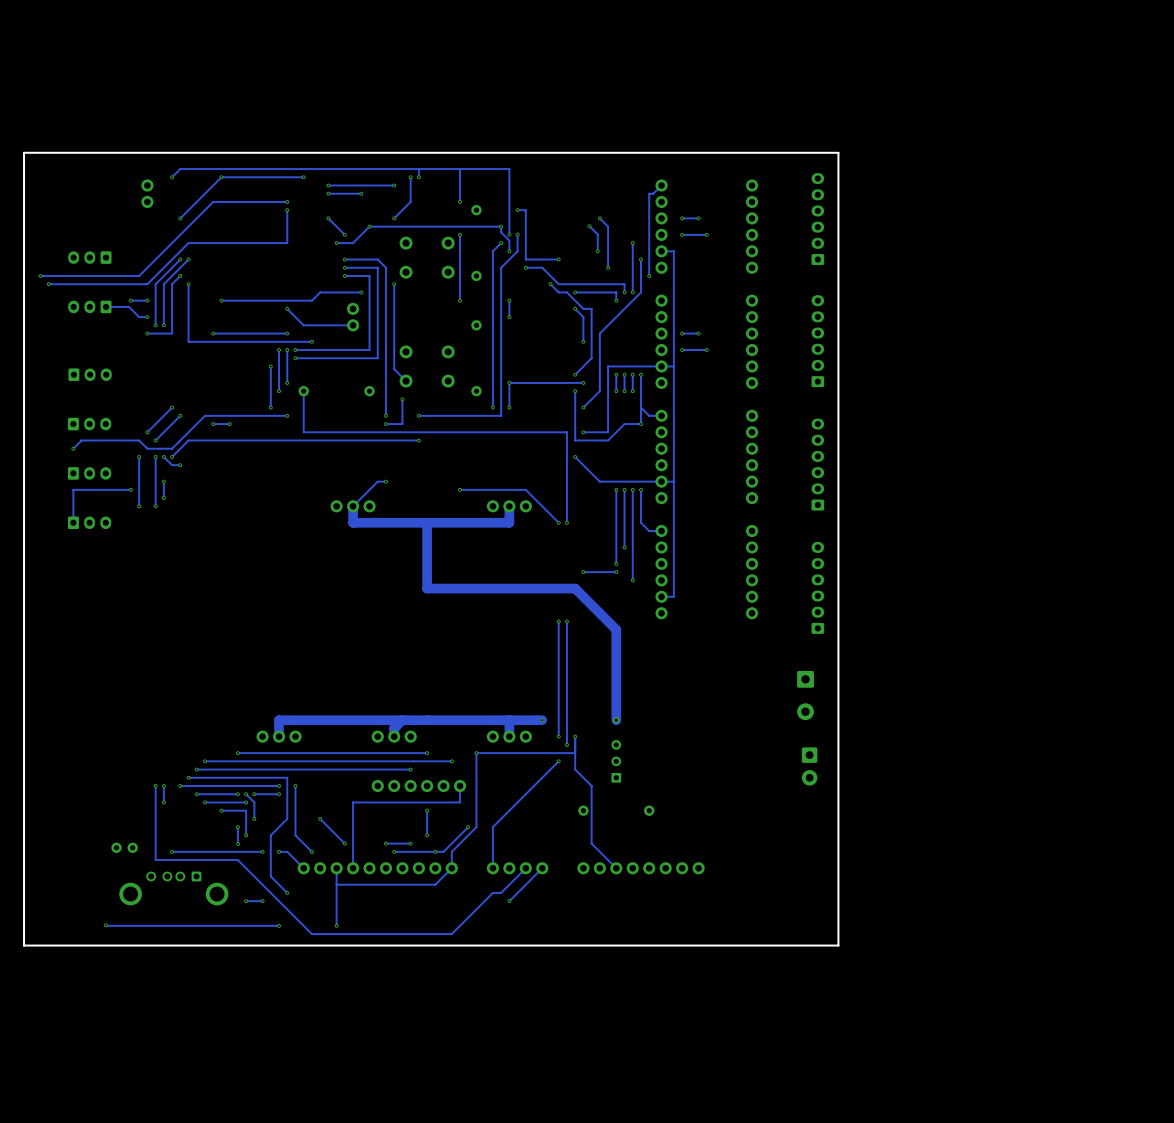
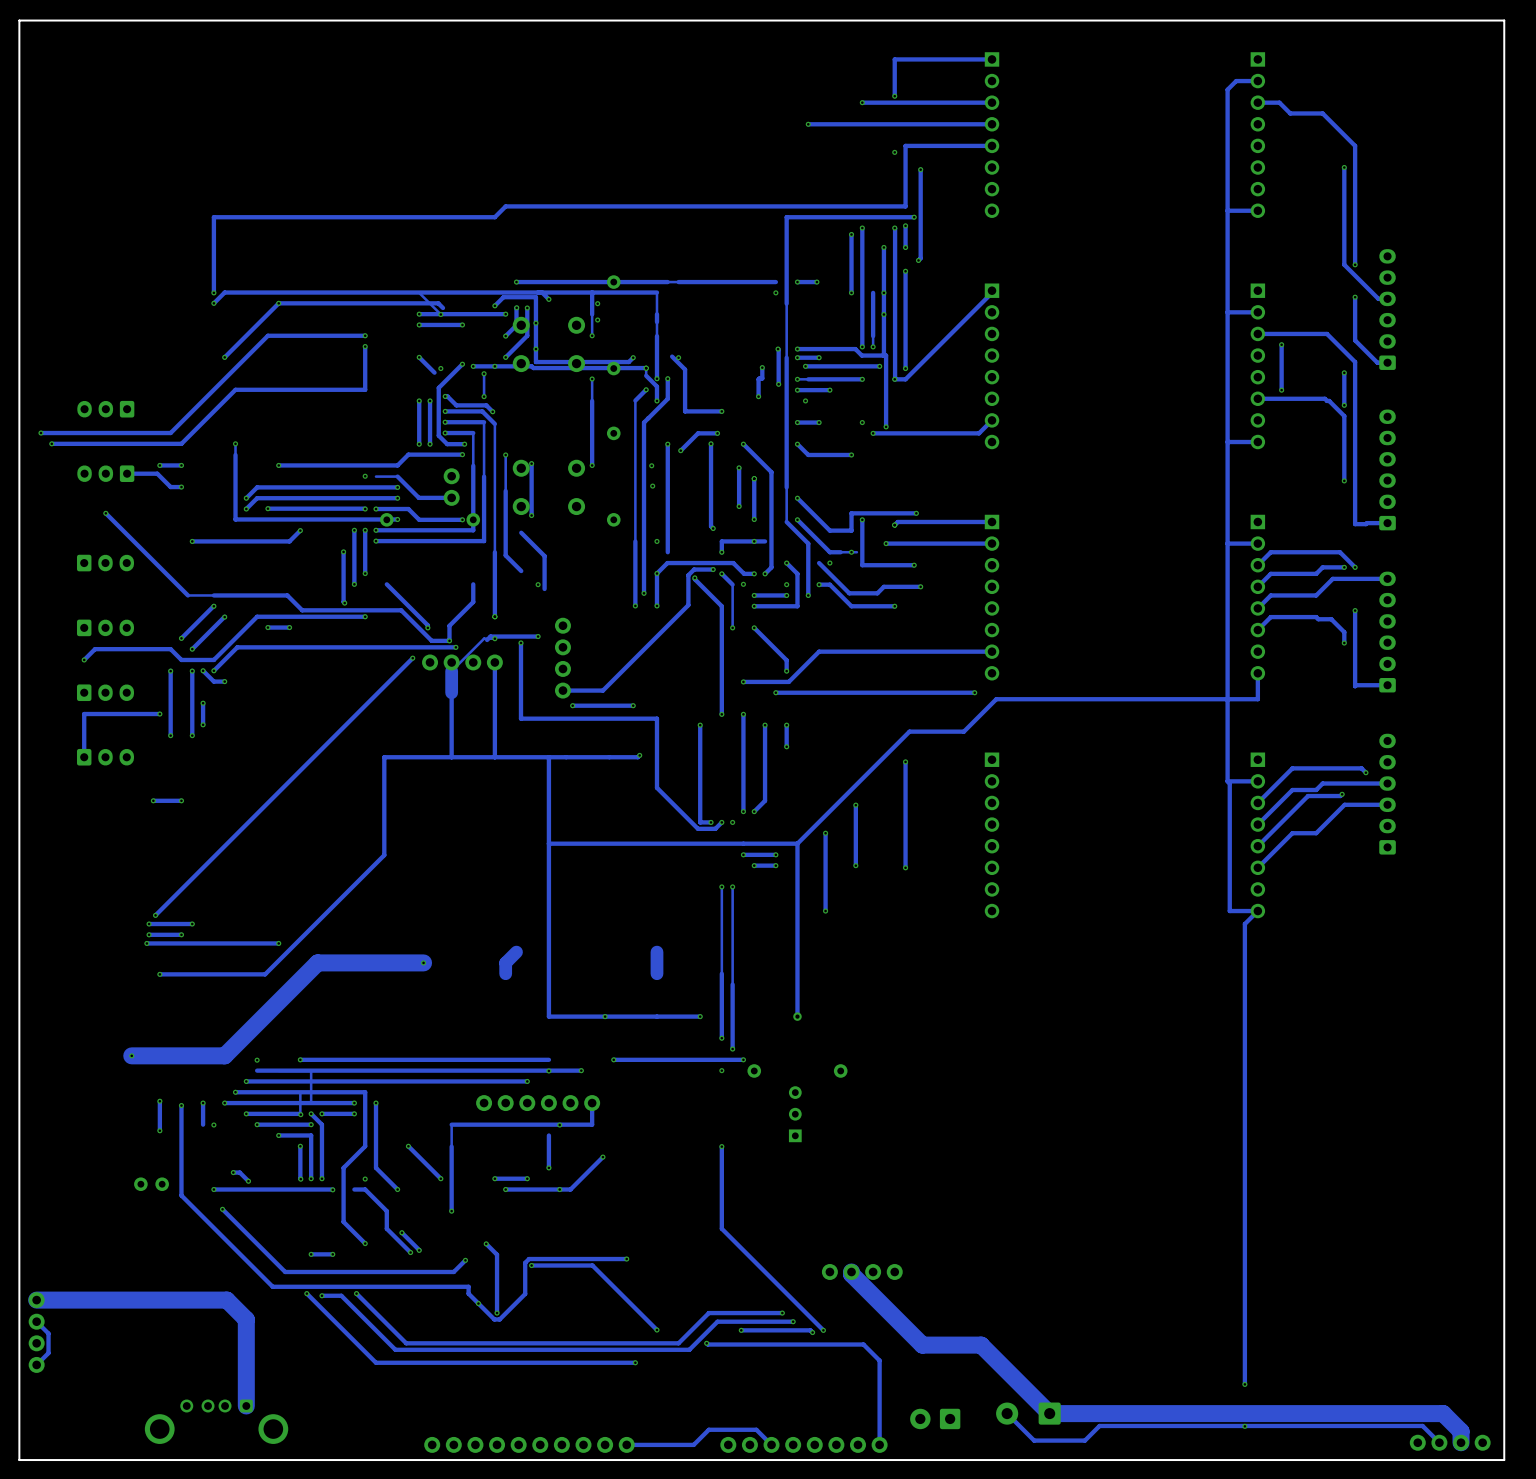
track: none -> (992, 59) (894, 59) (894, 96)
track: none -> (1257, 81) (1236, 81) (1227, 89) (1227, 781)
via: none -> (894, 96)
via: none -> (862, 102)
track: none -> (992, 102) (862, 102)
track: none -> (1257, 102) (1279, 102) (1290, 113) (1322, 113) (1355, 145) (1355, 264)
via: none -> (808, 124)
track: none -> (992, 124) (808, 124)
part: none -> (992, 135)
part: none -> (1257, 135)
track: none -> (992, 145) (905, 145) (905, 206) (505, 206) (494, 217) (213, 217) (213, 292)
via: none -> (894, 152)
track: none -> (1344, 167) (1344, 264) (1378, 298) (1387, 298)
via: none -> (1344, 167)
track: none -> (920, 169) (920, 258) (918, 260)
via: none -> (920, 169)
board edge: (24, 152) (838, 152) (838, 945) (24, 945) -> (19, 206) (19, 20) (1504, 20) (1504, 1460) (19, 1460) (19, 1248)
track: none -> (1257, 210) (1227, 210)
via: none -> (914, 217)
track: none -> (905, 225) (905, 247)
via: none -> (905, 225)
track: (418, 169) (418, 177) -> none
track: (460, 169) (460, 201) -> none
track: none -> (862, 228) (862, 346)
via: none -> (862, 228)
track: none -> (894, 228) (894, 379) (905, 379) (992, 292) (992, 290)
via: none -> (894, 228)
track: none -> (851, 234) (851, 292)
via: none -> (851, 234)
track: (172, 177) (180, 169) (509, 169) (509, 218) -> (213, 303) (224, 292) (656, 292)
via: (172, 177) -> none
via: (221, 177) -> none
track: (303, 177) (221, 177) (180, 218) -> none
via: (303, 177) -> none
track: (410, 177) (410, 201) (394, 218) -> none
via: (410, 177) -> none
via: (418, 177) -> none
track: none -> (883, 247) (883, 355)
via: none -> (883, 247)
via: none -> (905, 247)
via: (328, 185) -> none
track: (394, 185) (328, 185) -> (505, 314) (419, 314)
via: (394, 185) -> none
track: (661, 185) (653, 193) (649, 193) (649, 275) -> none
part: (147, 193) -> none
via: (328, 193) -> none
track: (361, 193) (328, 193) -> (462, 324) (419, 324)
via: (361, 193) -> none
via: none -> (918, 260)
via: none -> (1355, 264)
track: (287, 201) (213, 201) (139, 275) (40, 275) -> (365, 335) (267, 335) (170, 433) (40, 433)
via: (287, 201) -> none
via: (460, 201) -> none
track: none -> (905, 271) (905, 368)
via: none -> (905, 271)
track: (287, 210) (287, 243) (188, 243) (147, 284) (48, 284) -> (365, 346) (365, 389) (235, 389) (181, 443) (51, 443)
via: (287, 210) -> none
via: none -> (516, 282)
track: none -> (667, 282) (516, 282)
via: (517, 210) -> none
track: (525, 210) (525, 259) (558, 259) -> (678, 282) (775, 282)
via: none -> (797, 282)
track: none -> (816, 282) (797, 282)
via: none -> (816, 282)
via: none -> (213, 292)
via: (180, 218) -> none
via: (328, 218) -> none
via: (394, 218) -> none
track: none -> (542, 292) (548, 299)
track: none -> (592, 292) (592, 314)
track: (599, 218) (608, 226) -> (914, 217) (786, 217) (786, 303)
via: none -> (851, 292)
track: (698, 218) (682, 218) -> (819, 357) (797, 357)
via: (698, 218) -> none
part: (817, 219) -> none
track: none -> (1355, 297) (1355, 340) (1377, 362) (1387, 362)
via: none -> (1355, 297)
via: none -> (548, 299)
via: none -> (213, 303)
via: none -> (278, 303)
via: (369, 226) -> none
via: none -> (597, 303)
via: (501, 226) -> none
track: (589, 226) (597, 234) (597, 251) -> none
via: (589, 226) -> none
part: (661, 226) -> none
part: (752, 226) -> none
track: none -> (494, 305) (503, 297) (535, 297) (535, 362) (628, 362) (633, 357)
via: none -> (494, 305)
track: none -> (443, 308) (438, 303) (278, 303) (224, 357)
track: none -> (516, 307) (516, 325) (505, 336)
via: none -> (516, 307)
track: none -> (527, 308) (527, 335) (505, 357)
via: none -> (527, 308)
part: none -> (1387, 309)
track: none -> (1257, 312) (1227, 312)
via: none -> (419, 314)
via: none -> (505, 314)
via: (460, 234) -> none
via: (509, 234) -> none
track: (517, 234) (517, 251) (501, 267) (501, 275) -> (473, 366) (646, 368)
via: (517, 234) -> none
track: (706, 234) (682, 234) -> (829, 390) (797, 390)
via: (706, 234) -> none
via: none -> (597, 320)
track: (509, 240) (501, 232) (501, 226) (369, 226) (353, 243) (336, 243) -> (656, 322) (656, 314)
via: none -> (535, 323)
via: none -> (419, 324)
via: none -> (462, 324)
via: (336, 243) -> none
track: (501, 243) (492, 251) (492, 300) -> (646, 389) (635, 400)
via: (501, 243) -> none
track: (632, 243) (632, 292) -> none
via: (632, 243) -> none
track: none -> (1257, 333) (1327, 333) (1355, 362) (1355, 524) (1387, 523)
via: none -> (365, 335)
via: none -> (505, 336)
track: (460, 251) (460, 283) -> (430, 400) (430, 444)
via: none -> (592, 335)
track: none -> (656, 336) (656, 378)
via: (509, 251) -> none
via: (597, 251) -> none
track: (673, 251) (661, 251) -> (873, 336) (873, 292)
part: (89, 257) -> none
track: none -> (1281, 344) (1281, 390)
via: none -> (1281, 344)
track: (180, 259) (155, 284) (155, 325) -> none
via: (180, 259) -> none
track: (188, 259) (163, 284) (163, 325) -> none
via: (188, 259) -> none
via: none -> (365, 346)
track: (344, 259) (377, 259) (385, 267) (385, 318) -> (445, 411) (482, 411) (494, 423)
via: (344, 259) -> none
via: (558, 259) -> none
track: (640, 259) (640, 292) (599, 333) (599, 391) (583, 407) -> none
via: (640, 259) -> none
via: none -> (862, 346)
track: (673, 259) (673, 596) (661, 596) -> none
via: none -> (873, 346)
via: none -> (535, 349)
track: none -> (778, 349) (778, 384)
via: none -> (778, 349)
track: none -> (797, 349) (855, 349) (861, 355) (886, 355) (886, 426)
via: none -> (797, 349)
track: none -> (672, 356) (685, 369) (685, 411) (721, 411)
via: none -> (224, 357)
track: none -> (419, 357) (434, 372)
via: none -> (419, 357)
track: (344, 267) (377, 267) (377, 279) -> none
via: (344, 267) -> none
via: none -> (505, 357)
via: none -> (633, 357)
track: (525, 267) (542, 267) (558, 284) (616, 284) -> none
via: (608, 267) -> none
via: none -> (797, 357)
via: none -> (819, 357)
track: none -> (462, 364) (438, 387) (438, 435) (447, 444) (464, 444)
via: none -> (462, 364)
via: none -> (473, 366)
via: none -> (494, 366)
via: none -> (805, 366)
track: none -> (879, 366) (805, 366)
via: none -> (879, 366)
part: none -> (992, 366)
part: none -> (1257, 366)
via: (40, 275) -> none
track: (180, 275) (172, 284) (172, 333) (147, 333) -> none
via: (180, 275) -> none
track: (344, 275) (369, 275) (369, 325) -> (445, 433) (473, 433)
via: none -> (646, 368)
track: none -> (762, 367) (762, 378) (758, 379) (758, 396)
via: none -> (762, 367)
via: (649, 275) -> none
via: none -> (905, 368)
via: none -> (484, 373)
track: none -> (1344, 372) (1344, 405)
via: none -> (1344, 372)
track: (501, 281) (501, 415) (418, 415) -> none
via: none -> (656, 378)
track: none -> (667, 378) (667, 398) (648, 418)
via: none -> (667, 378)
via: (48, 284) -> none
track: (188, 284) (188, 333) -> none
via: (188, 284) -> none
track: (394, 284) (394, 341) -> none
via: (394, 284) -> none
track: (550, 284) (558, 292) (566, 292) (583, 308) (591, 308) (591, 358) (575, 374) -> none
via: (550, 284) -> none
via: none -> (797, 379)
track: (624, 284) (624, 292) -> (808, 379) (862, 379)
via: none -> (862, 379)
via: none -> (894, 379)
via: none -> (778, 384)
track: (361, 292) (320, 292) (311, 300) (221, 300) -> (462, 454) (408, 454) (397, 465) (278, 465)
via: (361, 292) -> none
via: none -> (646, 389)
track: (575, 292) (616, 292) (616, 300) -> none
via: (575, 292) -> none
via: none -> (797, 390)
via: (624, 292) -> none
via: (632, 292) -> none
via: none -> (829, 390)
via: none -> (1281, 390)
track: none -> (445, 396) (456, 405) (486, 405) (492, 411)
via: none -> (445, 396)
track: (377, 297) (377, 316) -> (445, 422) (484, 422)
via: none -> (484, 396)
via: none -> (758, 396)
track: none -> (1257, 398) (1324, 398) (1329, 400) (1344, 416) (1344, 480)
via: (130, 300) -> none
track: (147, 300) (130, 300) -> (181, 465) (159, 465)
via: (147, 300) -> none
via: (221, 300) -> none
track: none -> (419, 400) (419, 444)
via: none -> (419, 400)
via: none -> (430, 400)
track: none -> (592, 400) (592, 465)
via position: (460, 300) -> (592, 378)
track: (509, 300) (509, 317) -> (656, 400) (656, 386) (646, 375)
via: (616, 300) -> none
via: none -> (805, 400)
via: none -> (1344, 405)
track: (106, 306) (129, 306) (139, 317) (147, 317) -> (127, 473) (157, 473) (170, 487) (181, 487)
track: (287, 308) (303, 325) (353, 325) -> none
via: (287, 308) -> none
via: none -> (445, 411)
via: none -> (492, 411)
via: none -> (721, 411)
track: (575, 308) (583, 317) (583, 341) -> none
via: (575, 308) -> none
track: none -> (648, 418) (644, 422) (644, 593)
track: none -> (992, 420) (979, 433) (873, 433)
via: none -> (445, 422)
via: (147, 317) -> none
part position: (353, 317) -> (451, 487)
via: (509, 317) -> none
via: none -> (797, 422)
via: none -> (819, 422)
via: none -> (862, 422)
via: none -> (886, 426)
via: none -> (40, 433)
via: (155, 325) -> none
via: (163, 325) -> none
via: none -> (445, 433)
track: none -> (717, 433) (698, 433) (680, 450)
via: none -> (717, 433)
via: none -> (873, 433)
track: none -> (1257, 442) (1227, 442)
via: none -> (51, 443)
via: (147, 333) -> none
via: none -> (235, 443)
via: (213, 333) -> none
track: (287, 333) (213, 333) -> none
via: (287, 333) -> none
via: none -> (419, 444)
via: none -> (430, 444)
via: none -> (464, 444)
track: none -> (667, 444) (667, 552)
via: none -> (667, 444)
track: none -> (711, 443) (711, 526) (713, 528)
via: none -> (711, 443)
track: none -> (743, 444) (771, 472) (771, 567) (765, 573)
via: none -> (743, 444)
track: none -> (797, 444) (808, 454) (851, 454)
via: none -> (797, 444)
via: (682, 333) -> none
track: (698, 333) (682, 333) -> (819, 422) (797, 422)
via: (698, 333) -> none
via: none -> (680, 450)
track: (311, 341) (188, 341) -> (397, 519) (235, 519) (235, 454)
via: (311, 341) -> none
via: none -> (462, 454)
via: none -> (505, 454)
via: (583, 341) -> none
via: none -> (851, 454)
part: (661, 341) -> none
part: (752, 341) -> none
part: (817, 341) -> none
track: none -> (531, 463) (531, 515)
via: none -> (531, 463)
via: none -> (159, 465)
via: none -> (181, 465)
via: none -> (278, 465)
via: none -> (592, 465)
track: (279, 350) (279, 391) -> (354, 530) (354, 584)
via: (279, 350) -> none
track: (287, 350) (287, 382) -> (267, 508) (365, 508)
via: (287, 350) -> none
via: (295, 350) -> none
track: (369, 350) (295, 350) -> (473, 465) (473, 530) (376, 530)
via: none -> (651, 465)
via: (682, 350) -> none
track: (706, 350) (682, 350) -> (786, 595) (754, 595)
via: (706, 350) -> none
track: none -> (739, 467) (739, 506)
via: none -> (739, 467)
part: none -> (1387, 469)
via: none -> (365, 476)
via: (295, 358) -> none
track: (377, 358) (311, 358) -> (451, 497) (418, 497) (397, 476)
track: none -> (484, 476) (484, 541) (376, 541)
track: none -> (754, 478) (754, 519)
via: none -> (754, 478)
via: none -> (1344, 480)
via: none -> (652, 486)
via: none -> (181, 487)
track: (270, 366) (270, 407) -> none
via: (270, 366) -> none
track: none -> (397, 487) (257, 487) (246, 498)
via: none -> (397, 487)
track: (673, 366) (608, 366) -> (786, 357) (786, 487)
track: (394, 369) (406, 381) -> (505, 490) (505, 555) (521, 571)
part rotation: 0° (90, 374) -> 180° (105, 473)
via: none -> (246, 498)
track: none -> (397, 498) (257, 498) (246, 509)
via: none -> (397, 498)
via: (575, 374) -> none
track: (616, 374) (616, 391) -> (797, 498) (829, 530) (851, 530) (851, 513) (916, 513)
track: (624, 374) (624, 391) -> none
via: (624, 374) -> none
track: (632, 374) (632, 391) -> none
via: (632, 374) -> none
track: (640, 374) (640, 424) (624, 424) (608, 440) (575, 440) (575, 391) -> none
via: (640, 374) -> none
via: none -> (739, 506)
via: none -> (246, 509)
via: none -> (267, 508)
track: none -> (376, 509) (408, 509) (419, 519) (462, 519)
via: none -> (376, 509)
via: (509, 382) -> none
track: (583, 382) (509, 382) (509, 407) -> none
via: (583, 382) -> none
via: none -> (105, 513)
via: none -> (916, 513)
via: none -> (531, 515)
via: none -> (397, 519)
via: none -> (754, 519)
via: (279, 391) -> none
track: (303, 391) (303, 432) (566, 432) (566, 440) -> (721, 573) (732, 584)
via: none -> (462, 519)
via: (575, 391) -> none
via: (624, 391) -> none
via: (632, 391) -> none
track: none -> (862, 519) (862, 565) (914, 565)
via: none -> (862, 519)
track: (608, 392) (608, 432) (583, 432) -> (786, 521) (808, 543) (808, 595)
track: none -> (992, 521) (897, 521) (894, 525)
via: none -> (894, 525)
via: none -> (713, 528)
track: none -> (300, 530) (289, 541) (192, 541)
via: none -> (300, 530)
via: none -> (354, 530)
track: none -> (365, 530) (365, 573)
via: none -> (365, 530)
via: none -> (376, 530)
track: (402, 399) (402, 424) (385, 424) -> none
via: (402, 399) -> none
track: none -> (521, 532) (544, 556) (544, 588)
via: none -> (192, 541)
track: (172, 407) (147, 432) -> none
via: (172, 407) -> none
via: (270, 407) -> none
via: none -> (376, 541)
track: none -> (635, 541) (635, 605)
via: (492, 407) -> none
track: none -> (765, 541) (721, 541) (721, 552)
track: (640, 407) (649, 415) -> (797, 519) (829, 552) (840, 552)
via: none -> (886, 543)
track: none -> (992, 543) (886, 543)
track: none -> (1257, 543) (1227, 543)
track: (180, 415) (155, 440) -> none
via: (180, 415) -> none
track: none -> (343, 551) (344, 603)
via: none -> (343, 551)
track: (287, 415) (205, 415) (172, 448) -> (473, 584) (473, 602) (449, 625) (449, 640) (431, 640) (401, 610) (302, 610) (287, 595) (213, 595)
via: (287, 415) -> none
via: (385, 415) -> none
via: (418, 415) -> none
via: none -> (721, 552)
via: none -> (851, 552)
via: (213, 424) -> none
track: (229, 424) (213, 424) -> (289, 627) (267, 627)
via: (229, 424) -> none
via: (385, 424) -> none
track: none -> (786, 563) (797, 573) (797, 606) (754, 606)
via: none -> (786, 563)
track: none -> (819, 563) (849, 593) (877, 593) (883, 586) (920, 586)
via: none -> (914, 565)
track: none -> (1257, 565) (1270, 552) (1339, 552) (1355, 567)
track: none -> (1344, 567) (1322, 567) (1316, 573) (1270, 573) (1257, 586)
via: none -> (1344, 567)
via: none -> (1355, 567)
track: none -> (713, 569) (694, 569) (688, 575) (688, 605) (602, 690) (562, 690)
via: none -> (713, 569)
via: (147, 432) -> none
via: none -> (365, 573)
via: none -> (656, 573)
via: none -> (721, 573)
track: none -> (754, 573) (744, 573) (733, 563) (667, 563) (656, 573) (656, 605)
via: none -> (765, 573)
track: none -> (694, 577) (721, 606) (721, 714)
via: none -> (694, 577)
track: none -> (1387, 578) (1332, 578) (1316, 595) (1270, 595) (1257, 608)
via: (155, 440) -> none
via: none -> (354, 584)
track: none -> (386, 584) (427, 625) (427, 627)
track: (418, 440) (188, 440) (172, 456) -> (181, 638) (213, 605)
via: none -> (743, 584)
via: none -> (786, 584)
track: none -> (819, 584) (829, 584) (851, 606) (894, 606)
via: none -> (819, 584)
via: none -> (920, 586)
via: none -> (644, 593)
via: (73, 448) -> none
track: (152, 448) (147, 448) (139, 440) (81, 440) (73, 448) -> (187, 595) (105, 513)
via: none -> (754, 595)
via: none -> (786, 595)
via: none -> (808, 595)
part: none -> (992, 597)
part: none -> (1257, 597)
via: none -> (344, 603)
track: (139, 456) (139, 506) -> (170, 735) (170, 670)
via: (139, 456) -> none
track: (155, 456) (155, 506) -> (192, 735) (192, 670)
via: (155, 456) -> none
track: (163, 456) (172, 465) (180, 465) -> (192, 649) (224, 616)
via: (163, 456) -> none
via: none -> (635, 605)
via: none -> (656, 605)
track: (575, 456) (599, 481) (673, 481) -> none
via: (575, 456) -> none
via: none -> (754, 606)
part: (661, 456) -> none
via: none -> (894, 606)
part: (752, 456) -> none
track: none -> (1355, 610) (1355, 686) (1387, 685)
via: none -> (1355, 610)
track: none -> (365, 616) (257, 616) (213, 659) (181, 659) (170, 649) (95, 649) (84, 659)
via: none -> (365, 616)
via: none -> (494, 616)
part: (817, 464) -> none
via: none -> (267, 627)
via: none -> (289, 627)
via: none -> (427, 627)
track: (566, 473) (566, 522) -> none
via: none -> (732, 627)
track: none -> (754, 627) (786, 660) (786, 671)
via: none -> (754, 627)
track: none -> (1257, 630) (1270, 617) (1316, 617) (1318, 619) (1331, 619) (1344, 632) (1344, 643)
part: none -> (1387, 632)
track: none -> (538, 636) (490, 636) (487, 639)
via: none -> (538, 636)
via: none -> (181, 638)
track: (163, 481) (163, 498) -> (203, 703) (203, 724)
via: (163, 481) -> none
via: none -> (449, 640)
via: none -> (520, 642)
via: none -> (1344, 643)
track: none -> (455, 647) (237, 647) (213, 670)
via: none -> (455, 647)
track: (130, 489) (73, 489) (73, 522) -> (159, 714) (84, 714) (84, 757)
via: (130, 489) -> none
via: none -> (192, 649)
track: (460, 489) (525, 489) (558, 522) -> none
via: (460, 489) -> none
track: (616, 489) (616, 563) -> (743, 714) (743, 811)
via: (616, 489) -> none
track: (624, 489) (624, 547) -> none
via: (624, 489) -> none
track: (632, 489) (632, 580) -> none
via: (632, 489) -> none
track: (640, 489) (640, 522) (649, 531) (661, 531) -> none
via: (640, 489) -> none
track: none -> (992, 651) (819, 651) (788, 681) (743, 681)
track: none -> (412, 658) (155, 915)
via: none -> (412, 658)
part: none -> (562, 658)
via: none -> (84, 659)
via: (163, 498) -> none
part: none -> (462, 662)
track: none -> (494, 662) (494, 757)
track: none -> (203, 670) (213, 681) (224, 681)
via: none -> (203, 670)
via: none -> (213, 670)
part: (353, 506) -> none
track: (509, 506) (509, 522) (353, 522) -> (451, 757) (451, 692)
part: (509, 506) -> none
via: none -> (786, 671)
track: none -> (1257, 673) (1257, 699) (996, 699) (963, 731) (909, 731) (797, 843) (548, 843)
via: none -> (224, 681)
via: none -> (743, 681)
track: (427, 522) (427, 571) -> (494, 552) (494, 616)
via: (558, 522) -> none
via: (566, 522) -> none
via: none -> (775, 692)
track: none -> (974, 692) (775, 692)
via: none -> (974, 692)
via: none -> (203, 703)
via: none -> (572, 705)
track: none -> (633, 705) (572, 705)
via: none -> (633, 705)
via: none -> (159, 714)
via: none -> (721, 714)
via: none -> (743, 714)
via: none -> (203, 724)
track: none -> (700, 725) (700, 822) (711, 822)
via: none -> (700, 725)
track: none -> (765, 725) (765, 800) (754, 811)
via: none -> (765, 725)
track: none -> (786, 725) (786, 746)
via: none -> (786, 725)
via: (624, 547) -> none
via: none -> (170, 735)
via: none -> (192, 735)
via: none -> (786, 746)
via: (616, 563) -> none
track: none -> (639, 755) (637, 757) (384, 757) (384, 855) (265, 974) (159, 974)
via: none -> (639, 755)
part: none -> (105, 757)
track width: thick (427, 571) (427, 588) -> thin (548, 757) (548, 779)
via: (583, 572) -> none
track: (616, 572) (583, 572) -> none
via: (616, 572) -> none
part: (661, 572) -> none
part: (752, 572) -> none
track: none -> (905, 761) (905, 867)
via: none -> (905, 761)
via: (632, 580) -> none
track: none -> (1365, 772) (1361, 768) (1292, 768) (1257, 802)
via: none -> (1365, 772)
part: (817, 587) -> none
track: (427, 588) (575, 588) (616, 629) (616, 637) -> (548, 779) (548, 1016) (700, 1016)
track: none -> (1227, 781) (1229, 783) (1229, 911) (1257, 911) (1244, 924) (1244, 1384)
track: none -> (1257, 781) (1227, 781)
track: none -> (1387, 783) (1322, 783) (1316, 790) (1292, 790) (1257, 824)
part: none -> (1387, 794)
track: none -> (1342, 794) (1340, 796) (1308, 796) (1257, 846)
via: none -> (1342, 794)
via: none -> (153, 800)
track: none -> (181, 800) (153, 800)
via: none -> (181, 800)
track: none -> (855, 805) (855, 865)
via: none -> (855, 805)
track: none -> (1387, 804) (1344, 804) (1316, 833) (1292, 833) (1257, 867)
via: none -> (743, 811)
via: none -> (754, 811)
via: none -> (711, 822)
track: (558, 621) (558, 670) -> (721, 822) (715, 828) (697, 828) (656, 787) (656, 718) (520, 718) (520, 642)
track: (566, 621) (566, 670) -> (797, 952) (797, 1016)
track: none -> (825, 833) (825, 911)
via: none -> (825, 833)
part: none -> (992, 835)
part: none -> (1257, 835)
track width: thick (616, 637) (616, 720) -> thin (797, 843) (797, 952)
via: none -> (743, 854)
track: none -> (775, 854) (743, 854)
via: none -> (775, 854)
via: none -> (754, 865)
track: none -> (775, 865) (754, 865)
via: none -> (775, 865)
via: none -> (855, 865)
via: none -> (905, 867)
via: none -> (721, 886)
via: none -> (732, 886)
via: none -> (825, 911)
via: none -> (155, 915)
part: (805, 695) -> none
via: none -> (149, 924)
track: none -> (192, 924) (149, 924)
via: none -> (192, 924)
via: none -> (149, 934)
track: none -> (181, 934) (149, 934)
via: none -> (181, 934)
via: none -> (146, 943)
track: none -> (278, 943) (146, 943)
via: none -> (278, 943)
track: (542, 720) (279, 720) (279, 736) -> none
via: (542, 720) -> none
via: (616, 720) -> none
track: none -> (423, 962) (317, 962) (224, 1055) (131, 1055)
via: none -> (423, 962)
part: (279, 736) -> none
part: (394, 736) -> none
part: (509, 736) -> none
track: none -> (721, 973) (721, 1038)
via: (558, 736) -> none
track: (575, 736) (575, 769) (591, 786) (591, 843) (616, 868) -> none
via: (575, 736) -> none
via: none -> (159, 974)
track: none -> (732, 984) (732, 1049)
via: (566, 744) -> none
via: (237, 753) -> none
track: (427, 753) (237, 753) -> (548, 1059) (300, 1059)
via: (427, 753) -> none
via: (476, 753) -> none
track: (575, 753) (476, 753) (476, 827) (451, 851) (451, 868) (435, 884) (336, 884) -> none
via: (205, 761) -> none
track: (451, 761) (205, 761) -> (581, 1070) (257, 1070)
via: (451, 761) -> none
track: (558, 761) (492, 827) (492, 868) -> none
via: (558, 761) -> none
part position: (616, 761) -> (795, 1114)
part: (809, 766) -> none
via: (196, 769) -> none
track: (410, 769) (196, 769) -> (527, 1081) (246, 1081)
via: (410, 769) -> none
via: none -> (605, 1016)
via: none -> (700, 1016)
via: none -> (797, 1016)
track: (188, 777) (287, 777) (287, 818) (270, 835) (270, 876) (287, 892) -> (235, 1092) (365, 1092) (365, 1146) (343, 1167) (343, 1221) (365, 1243)
via: (188, 777) -> none
via: none -> (721, 1038)
track: (155, 786) (155, 860) (237, 860) (311, 934) (451, 934) (492, 892) (501, 892) (525, 868) -> none
via: (155, 786) -> none
track: (163, 786) (163, 802) -> (203, 1103) (203, 1124)
via: (163, 786) -> none
via: (180, 786) -> none
track: (279, 786) (180, 786) -> (354, 1103) (224, 1103)
via: (279, 786) -> none
track: (295, 786) (295, 835) -> (451, 1146) (451, 1211)
via: (295, 786) -> none
part position: (418, 786) -> (538, 1103)
track: (460, 786) (460, 802) (353, 802) (353, 851) -> (592, 1103) (592, 1124) (451, 1124)
via: none -> (732, 1049)
via: (196, 794) -> none
track: (237, 794) (196, 794) -> (300, 1113) (246, 1113)
via: (237, 794) -> none
track: (246, 794) (254, 802) (254, 818) -> none
via: (246, 794) -> none
via: (254, 794) -> none
track: (279, 794) (254, 794) -> (354, 1113) (321, 1113)
via: (279, 794) -> none
via: none -> (131, 1055)
via: (163, 802) -> none
via: none -> (300, 1059)
track: (246, 802) (205, 802) -> (311, 1124) (257, 1124)
via: (246, 802) -> none
via: none -> (613, 1059)
track: none -> (743, 1059) (613, 1059)
via: none -> (743, 1059)
via: (221, 810) -> none
track: (427, 810) (427, 835) -> (548, 1135) (548, 1167)
via: none -> (581, 1070)
via: none -> (721, 1070)
via: none -> (246, 1081)
via: (254, 818) -> none
track: (320, 818) (344, 843) -> (408, 1146) (440, 1178)
via: (320, 818) -> none
via: none -> (527, 1081)
via: none -> (235, 1092)
via: (237, 827) -> none
track: (468, 827) (443, 851) (394, 851) -> (602, 1157) (570, 1189) (505, 1189)
via: (468, 827) -> none
track: none -> (159, 1101) (159, 1130)
via: none -> (159, 1101)
via: none -> (203, 1103)
via: none -> (224, 1103)
via: (246, 835) -> none
via: none -> (354, 1103)
track: (295, 835) (311, 851) -> (376, 1103) (376, 1167) (397, 1189)
via: none -> (376, 1103)
via: (427, 835) -> none
track: none -> (181, 1105) (181, 1195) (272, 1286) (468, 1286) (468, 1293) (494, 1319) (499, 1319) (525, 1293) (525, 1262) (529, 1259) (626, 1259)
via: none -> (181, 1105)
via: none -> (246, 1113)
track: none -> (311, 1113) (321, 1124) (321, 1178)
via: none -> (311, 1113)
via: none -> (321, 1113)
via: none -> (354, 1113)
via: (344, 843) -> none
via: (385, 843) -> none
track: (410, 843) (385, 843) -> (527, 1178) (494, 1178)
via: (410, 843) -> none
part position: (124, 847) -> (151, 1184)
via: none -> (257, 1124)
via: none -> (311, 1124)
track: (262, 851) (172, 851) -> none
via: (262, 851) -> none
track: (279, 851) (287, 851) (303, 868) -> none
via: (279, 851) -> none
via: (311, 851) -> none
via: (394, 851) -> none
via: none -> (159, 1130)
track: none -> (278, 1135) (311, 1135) (311, 1178)
via: none -> (278, 1135)
track: none -> (300, 1146) (300, 1179)
via: none -> (300, 1146)
via: none -> (408, 1146)
track: (336, 868) (336, 884) -> none
part: (377, 868) -> none
part: (517, 868) -> none
track: (542, 868) (509, 901) -> none
track: none -> (721, 1146) (721, 1228) (823, 1330)
via: none -> (721, 1146)
part: (640, 868) -> none
via: none -> (602, 1157)
track: (336, 884) (336, 925) -> none
via: none -> (548, 1167)
part: (173, 888) -> none
track: none -> (233, 1172) (239, 1172) (248, 1181)
via: none -> (233, 1172)
via: none -> (311, 1178)
via: none -> (321, 1178)
via: none -> (440, 1178)
via: none -> (494, 1178)
via: none -> (527, 1178)
via: none -> (300, 1179)
via: none -> (248, 1181)
via: none -> (213, 1189)
track: none -> (354, 1189) (365, 1189) (386, 1211) (386, 1228) (410, 1252)
via: none -> (397, 1189)
via: none -> (505, 1189)
via: none -> (559, 1189)
via: (246, 901) -> none
track: (262, 901) (246, 901) -> (332, 1189) (213, 1189)
via: (509, 901) -> none
track: none -> (222, 1209) (285, 1271) (453, 1271) (465, 1260)
via: none -> (222, 1209)
via: none -> (451, 1211)
track: (105, 925) (279, 925) -> none
via: (105, 925) -> none
via: (279, 925) -> none
via: (336, 925) -> none
track: none -> (401, 1232) (419, 1250)
via: none -> (401, 1232)
via: none -> (365, 1243)
track: none -> (486, 1243) (497, 1254) (497, 1313)
via: none -> (486, 1243)
via: none -> (419, 1250)
via: none -> (410, 1252)
via: none -> (311, 1254)
track: none -> (332, 1254) (311, 1254)
via: none -> (332, 1254)
via: none -> (626, 1259)
via: none -> (465, 1260)
track: none -> (531, 1265) (592, 1265) (656, 1330)
via: none -> (531, 1265)
track: none -> (851, 1271) (851, 1274) (922, 1345) (981, 1345) (1049, 1413) (1443, 1413) (1461, 1431) (1461, 1442)
part: none -> (862, 1271)
track: none -> (306, 1293) (376, 1362) (635, 1362)
via: none -> (306, 1293)
track: none -> (356, 1293) (406, 1343) (678, 1343) (708, 1313) (782, 1313)
via: none -> (356, 1293)
track: none -> (321, 1295) (341, 1295) (395, 1349) (689, 1349) (717, 1321) (793, 1321)
via: none -> (321, 1295)
track: none -> (36, 1300) (226, 1300) (246, 1319) (246, 1406)
via: none -> (478, 1303)
via: none -> (497, 1313)
via: none -> (782, 1313)
track: none -> (36, 1321) (48, 1333) (48, 1353) (36, 1364)
via: none -> (793, 1321)
via: none -> (656, 1330)
track: none -> (741, 1330) (810, 1330) (812, 1332)
via: none -> (741, 1330)
via: none -> (823, 1330)
part: none -> (36, 1332)
via: none -> (812, 1332)
track: none -> (706, 1343) (863, 1344) (879, 1360) (879, 1444)
via: none -> (706, 1343)
via: none -> (635, 1362)
via: none -> (1244, 1384)
track: none -> (1007, 1413) (1034, 1440) (1084, 1440) (1099, 1425) (1422, 1425) (1439, 1442)
part: none -> (1028, 1413)
part: none -> (935, 1418)
part: none -> (216, 1421)
via: none -> (1244, 1426)
part: none -> (1450, 1442)
part: none -> (529, 1444)
track: none -> (771, 1444) (756, 1429) (708, 1429) (693, 1444) (626, 1444)
part: none -> (803, 1444)

